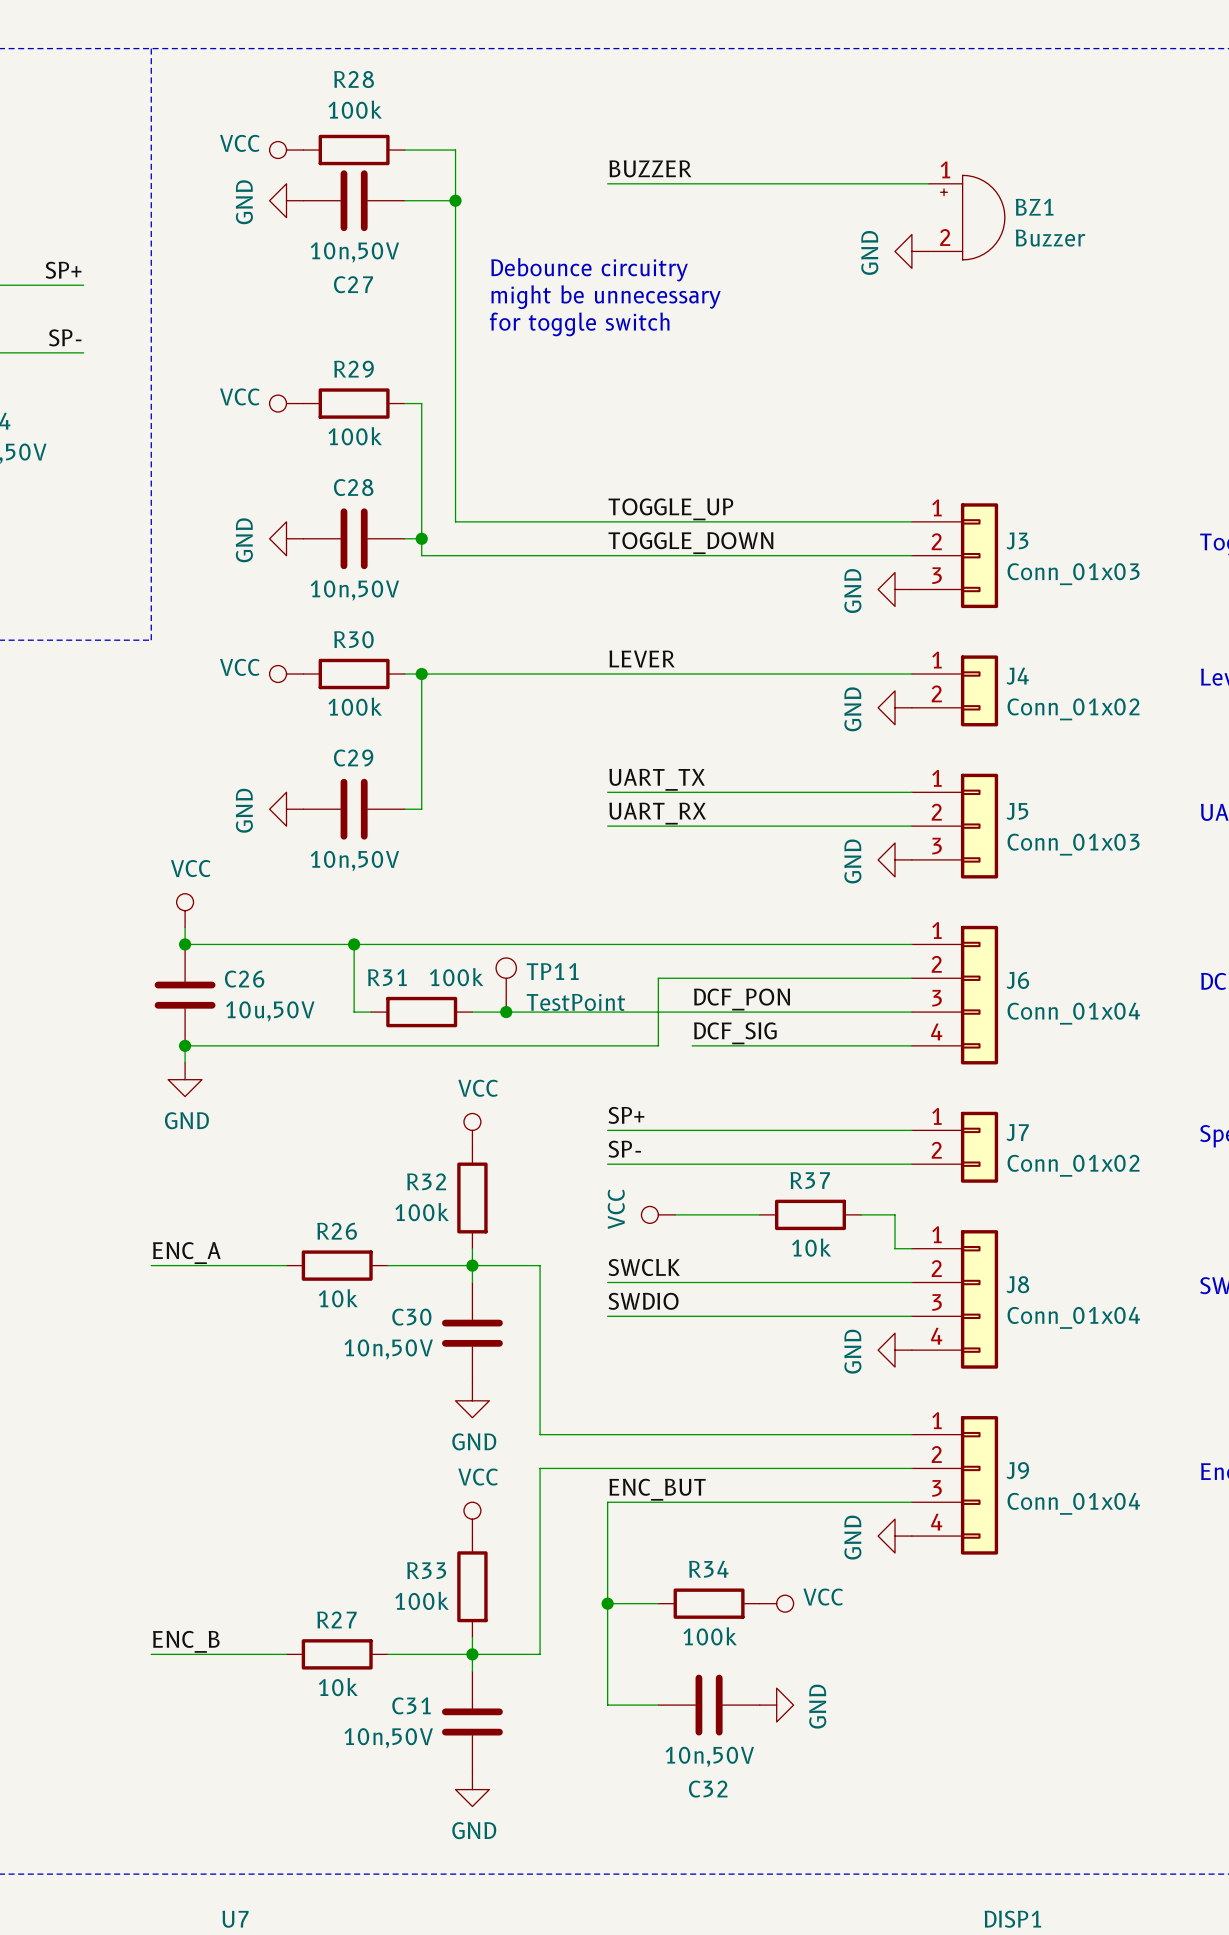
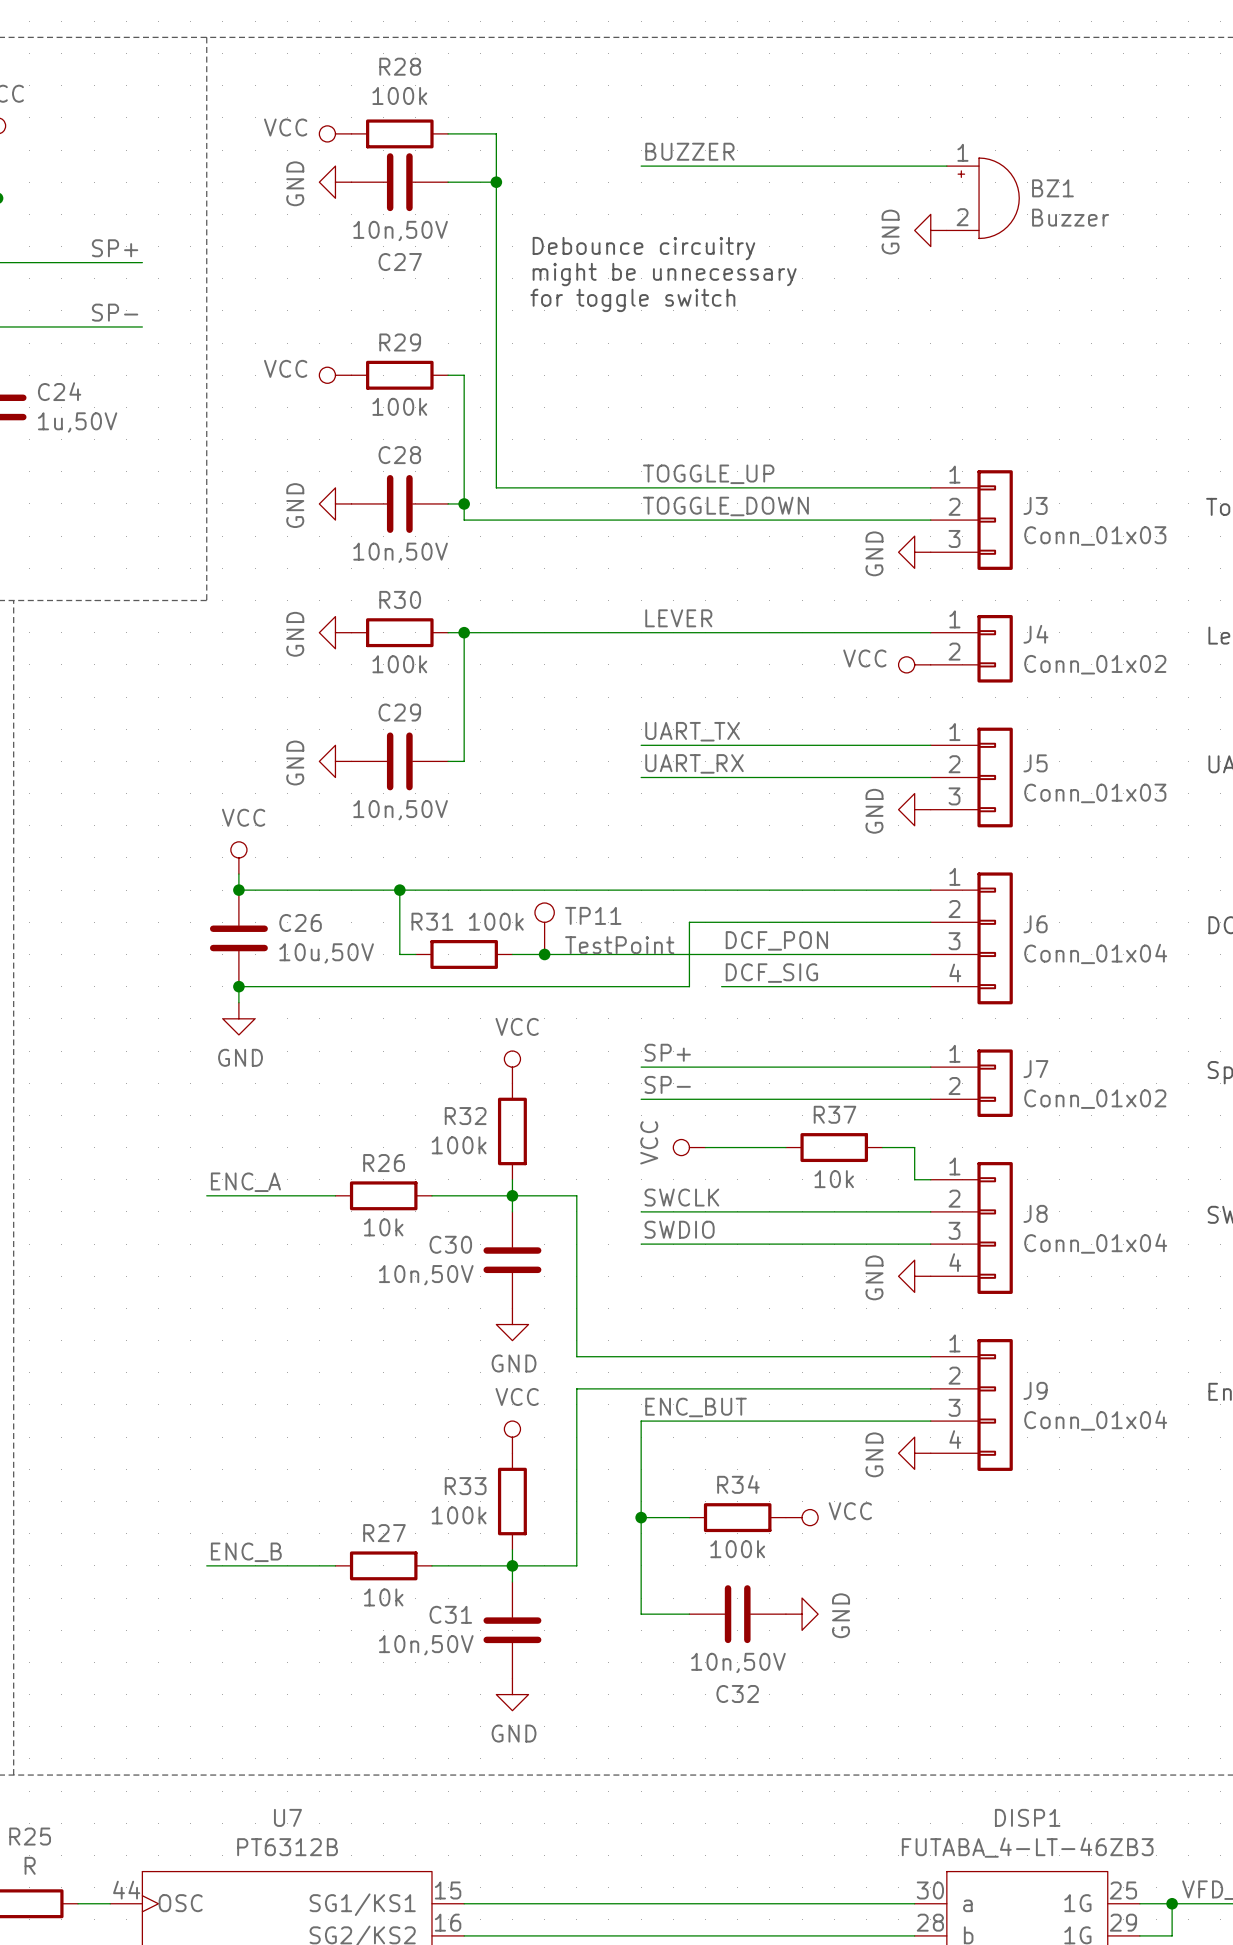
power symbol: VCC (286, 674) -> GND (335, 632)
power symbol: GND (895, 707) -> VCC (914, 664)

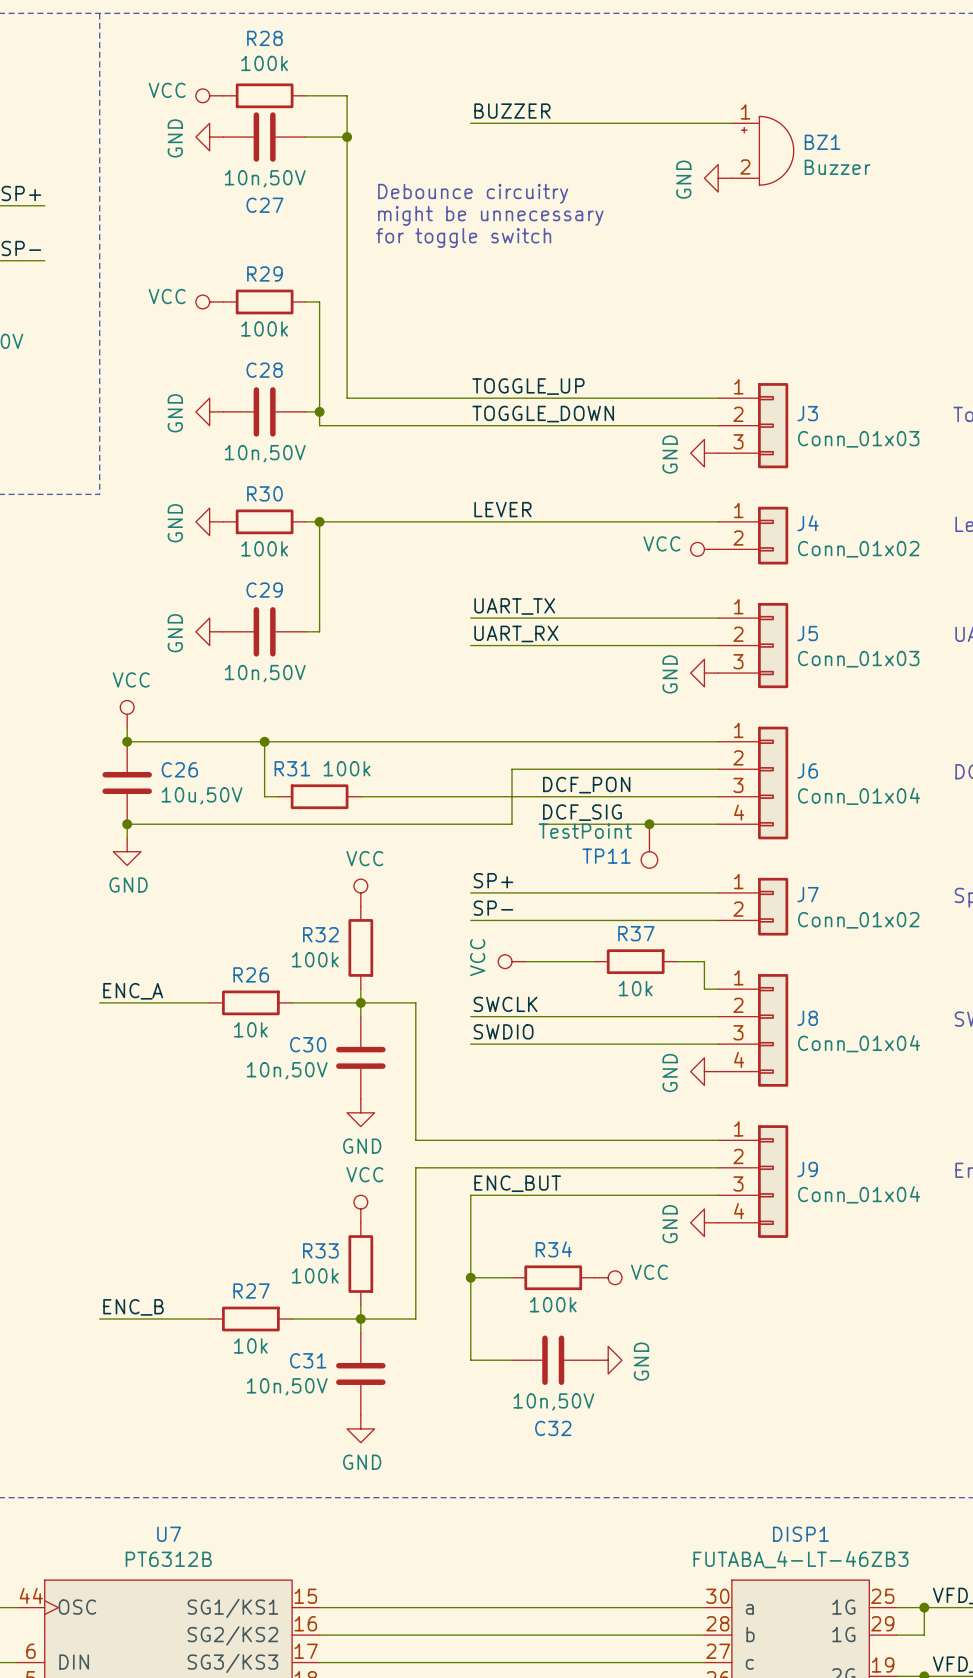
TP11 rotation: 0° (544, 912) -> 180° (649, 859)
TP11 position: (544, 928) -> (649, 846)
junction: (544, 954) -> none
junction: none -> (649, 824)

